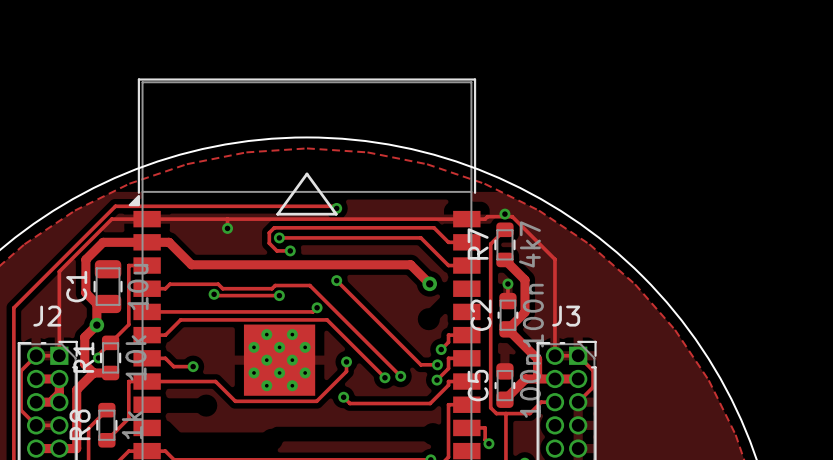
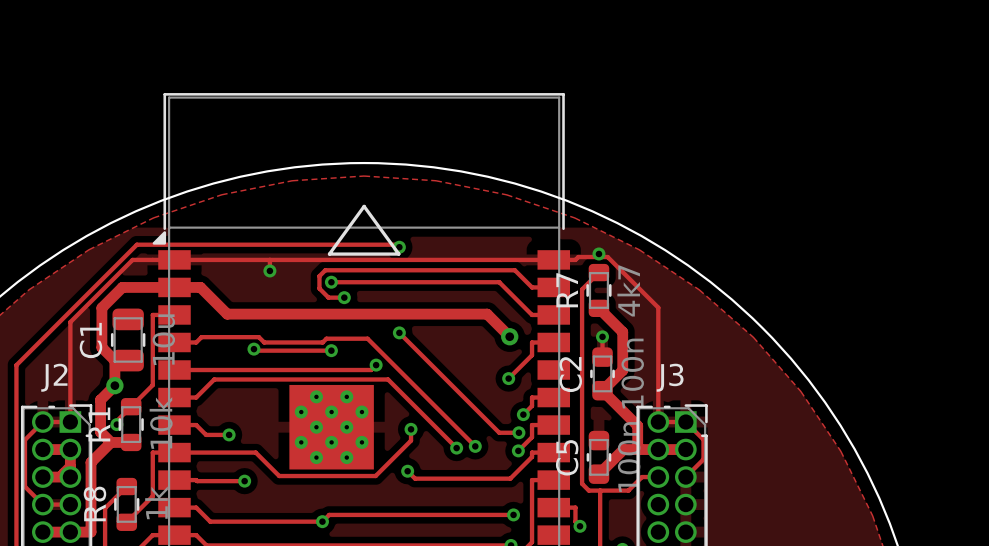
track: none -> (553, 342) (532, 342) (532, 355) (508, 378)
via: none -> (508, 378)
track: none -> (174, 480) (244, 481)
via: none -> (244, 481)
track: none -> (174, 507) (196, 507) (210, 521) (322, 521) (329, 514) (513, 514)
via: none -> (513, 514)
via: none -> (322, 521)

